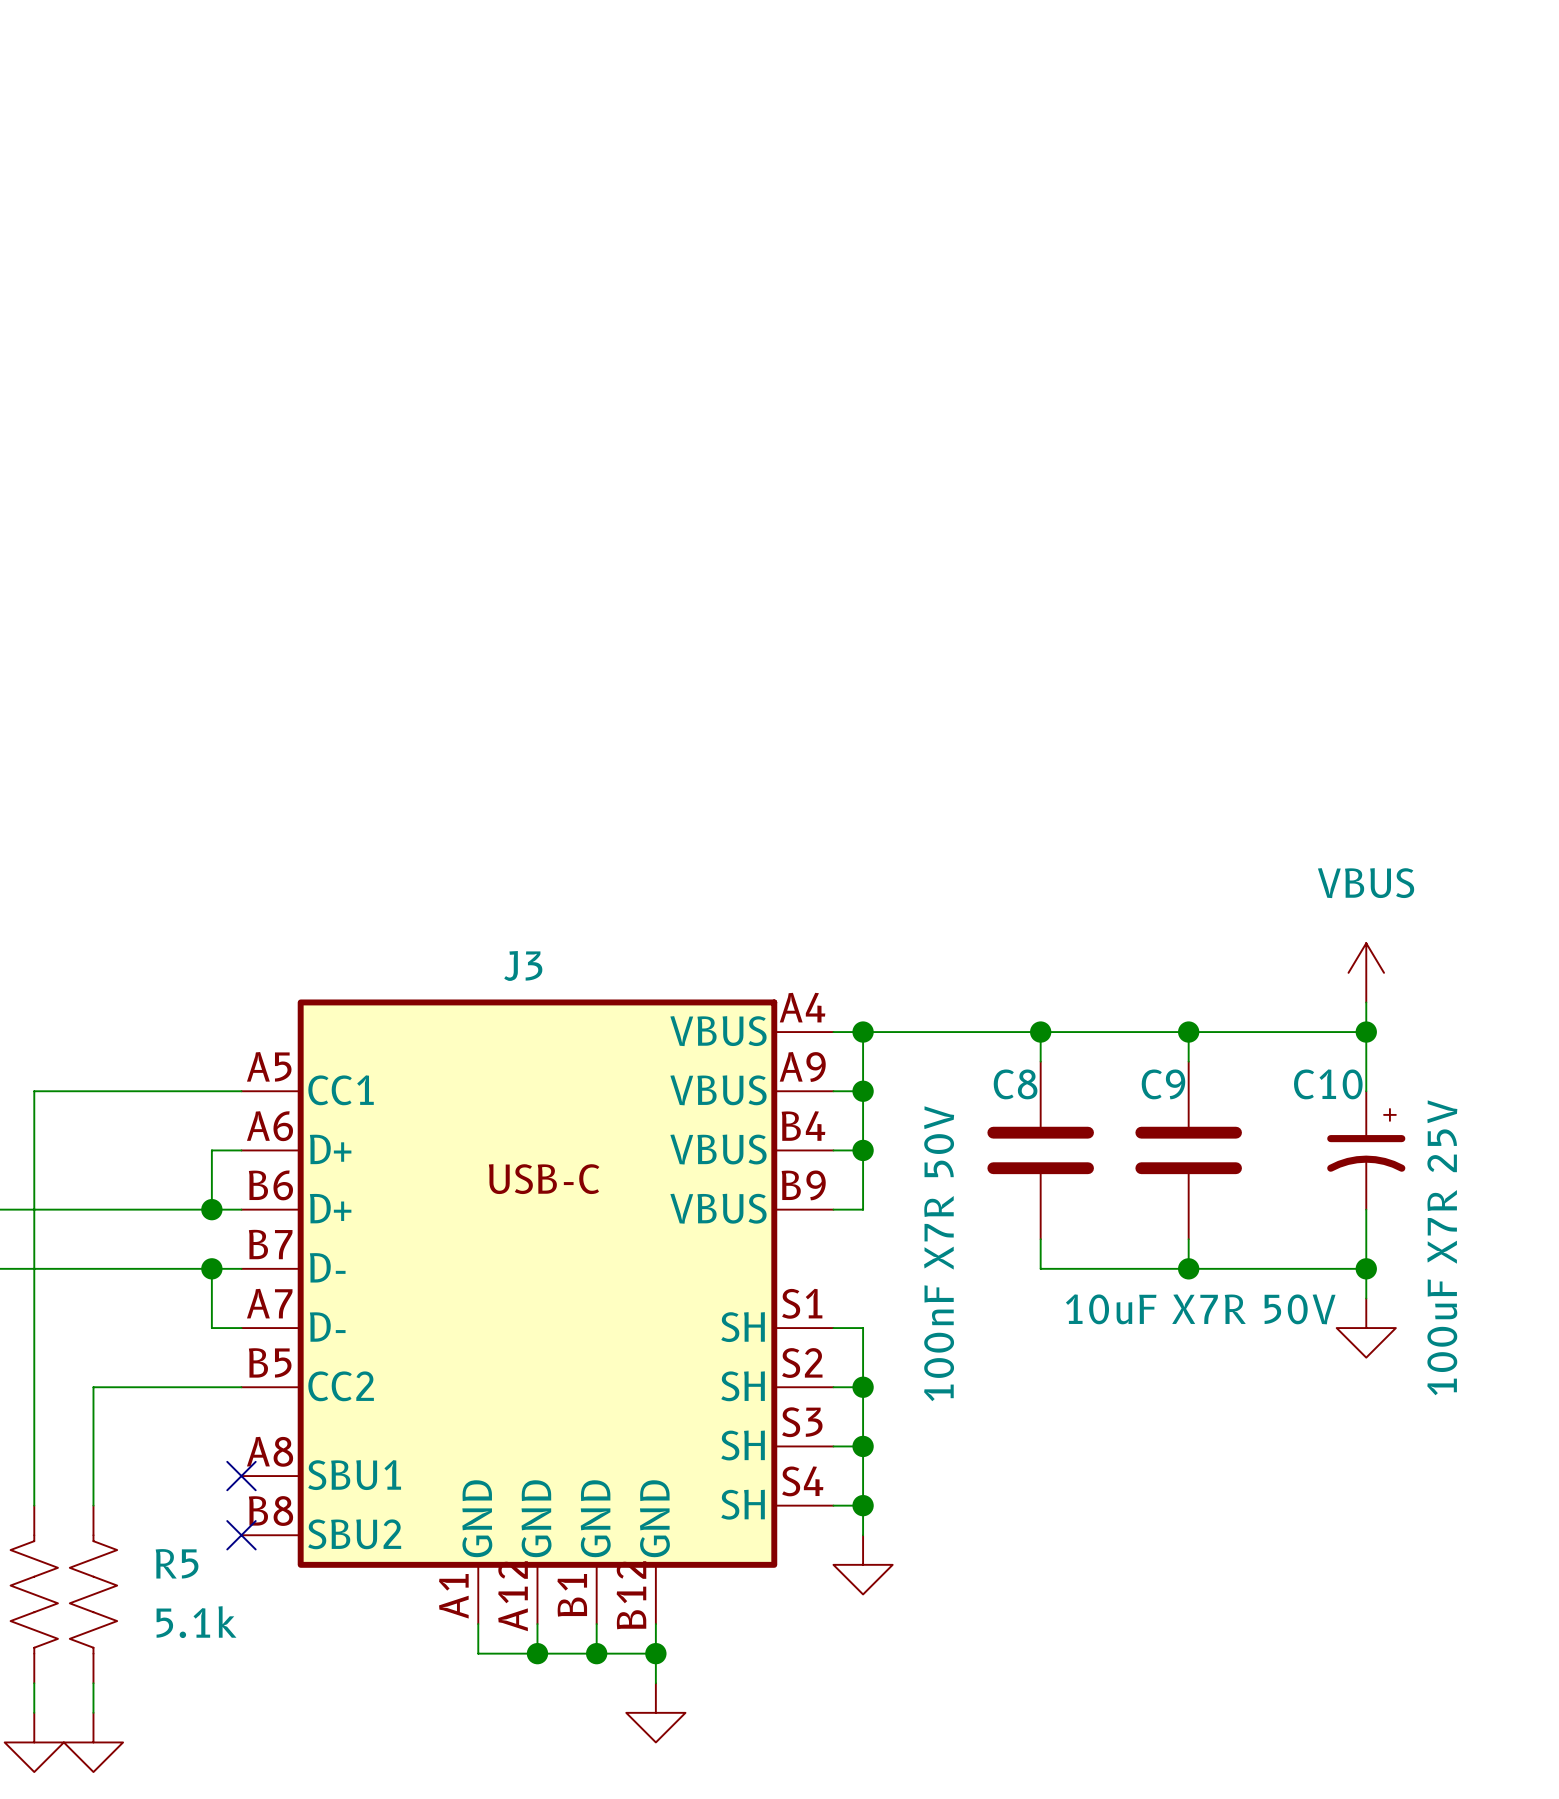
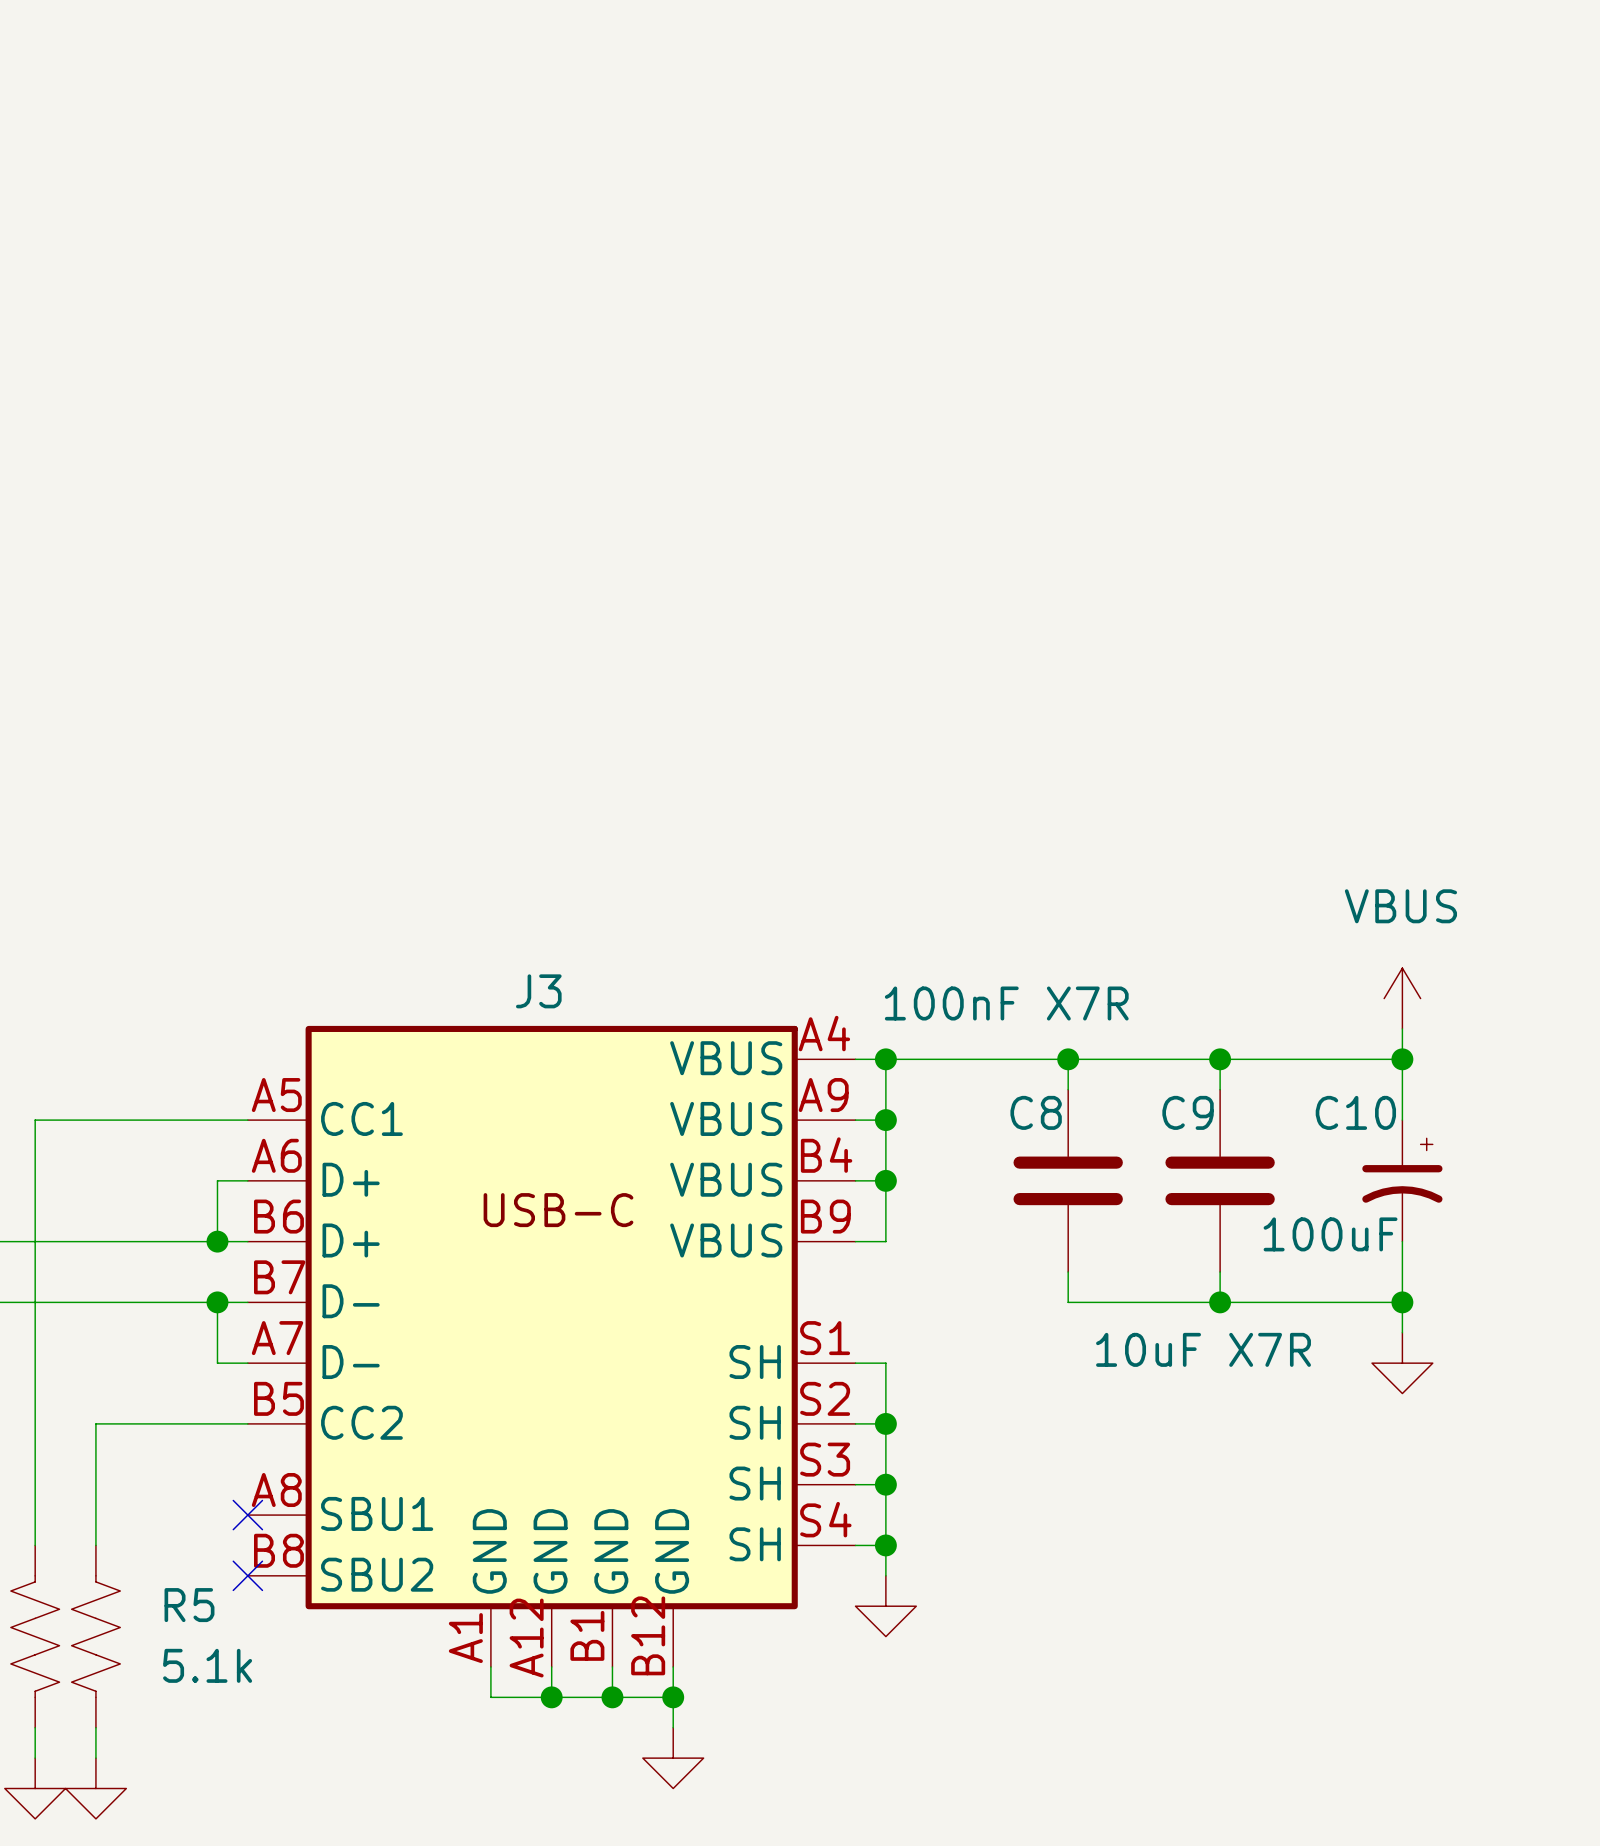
C10 value: 100uF X7R 25V (1442, 1247) -> 100uF (1330, 1234)
C8 value: 100nF X7R 50V (939, 1253) -> 100nF X7R (1006, 1003)
C9 value: 10uF X7R 50V (1200, 1309) -> 10uF X7R (1203, 1349)

